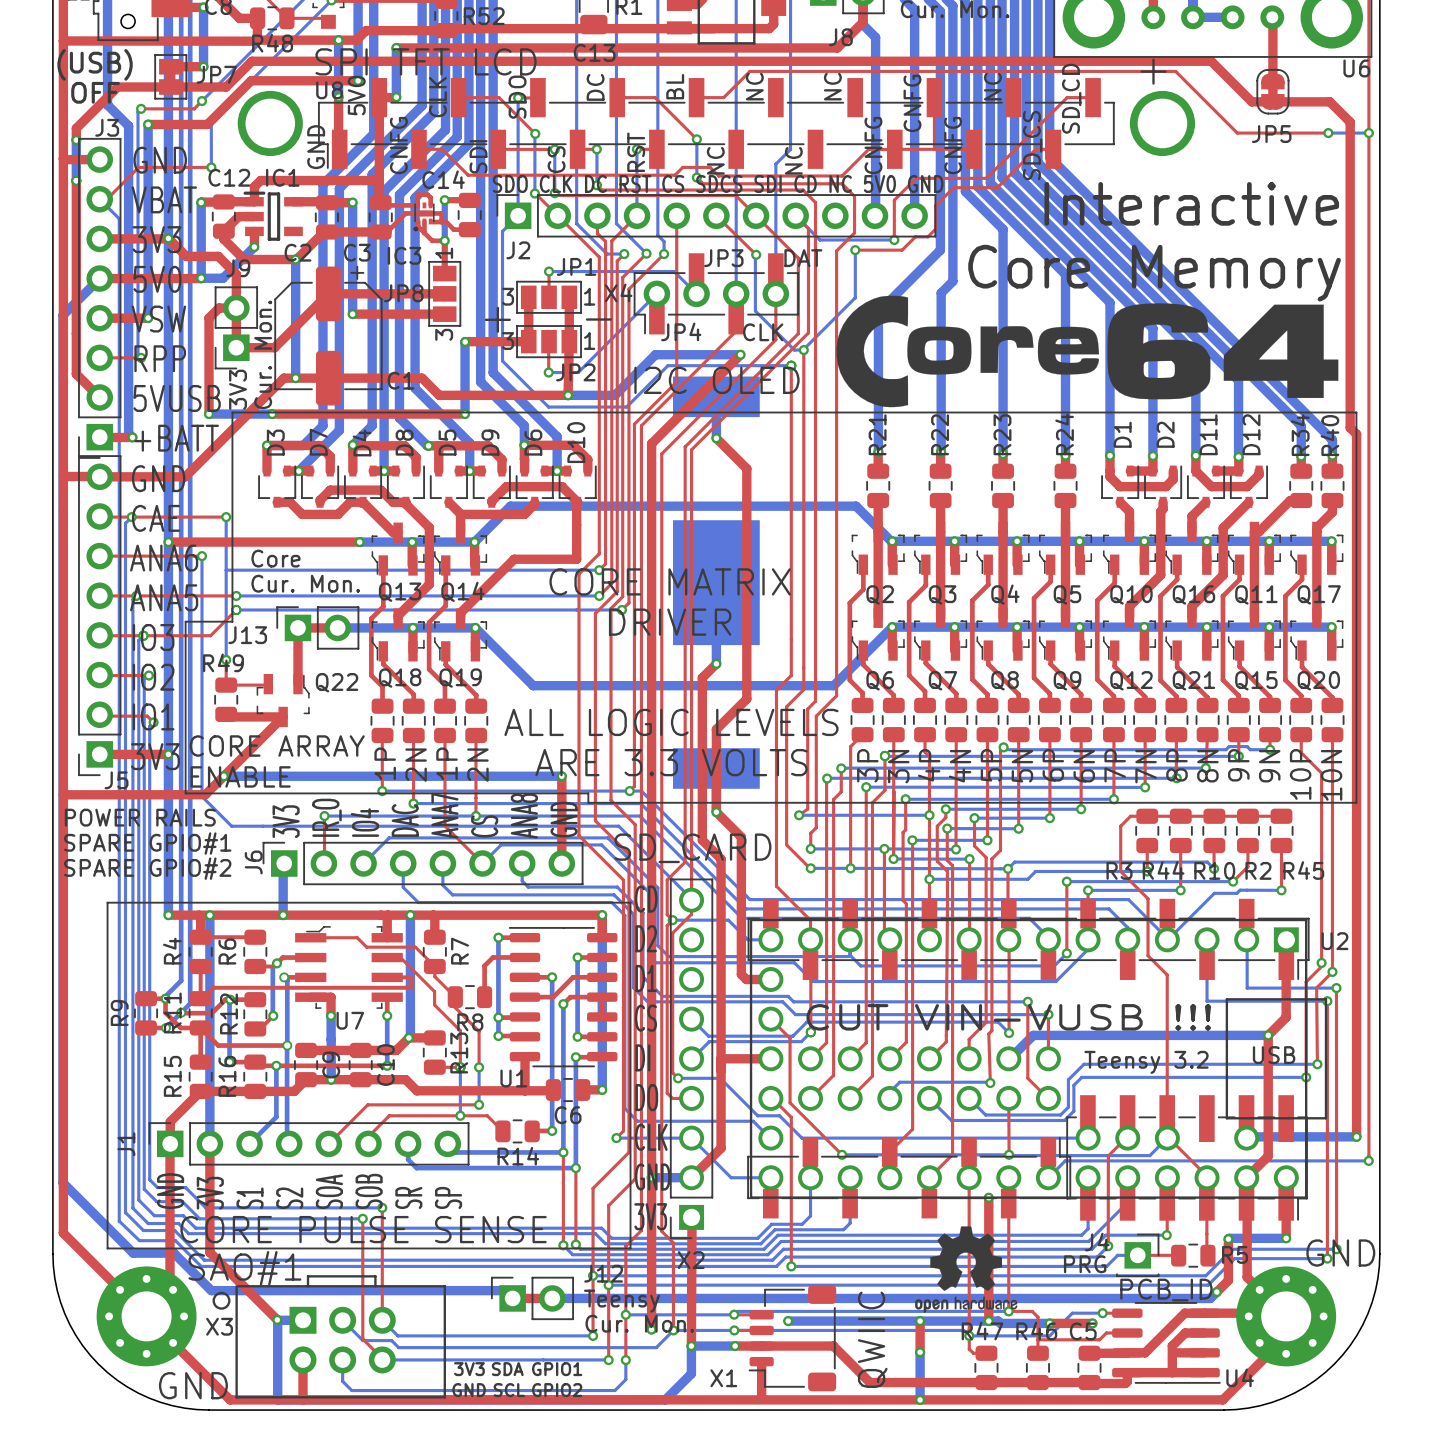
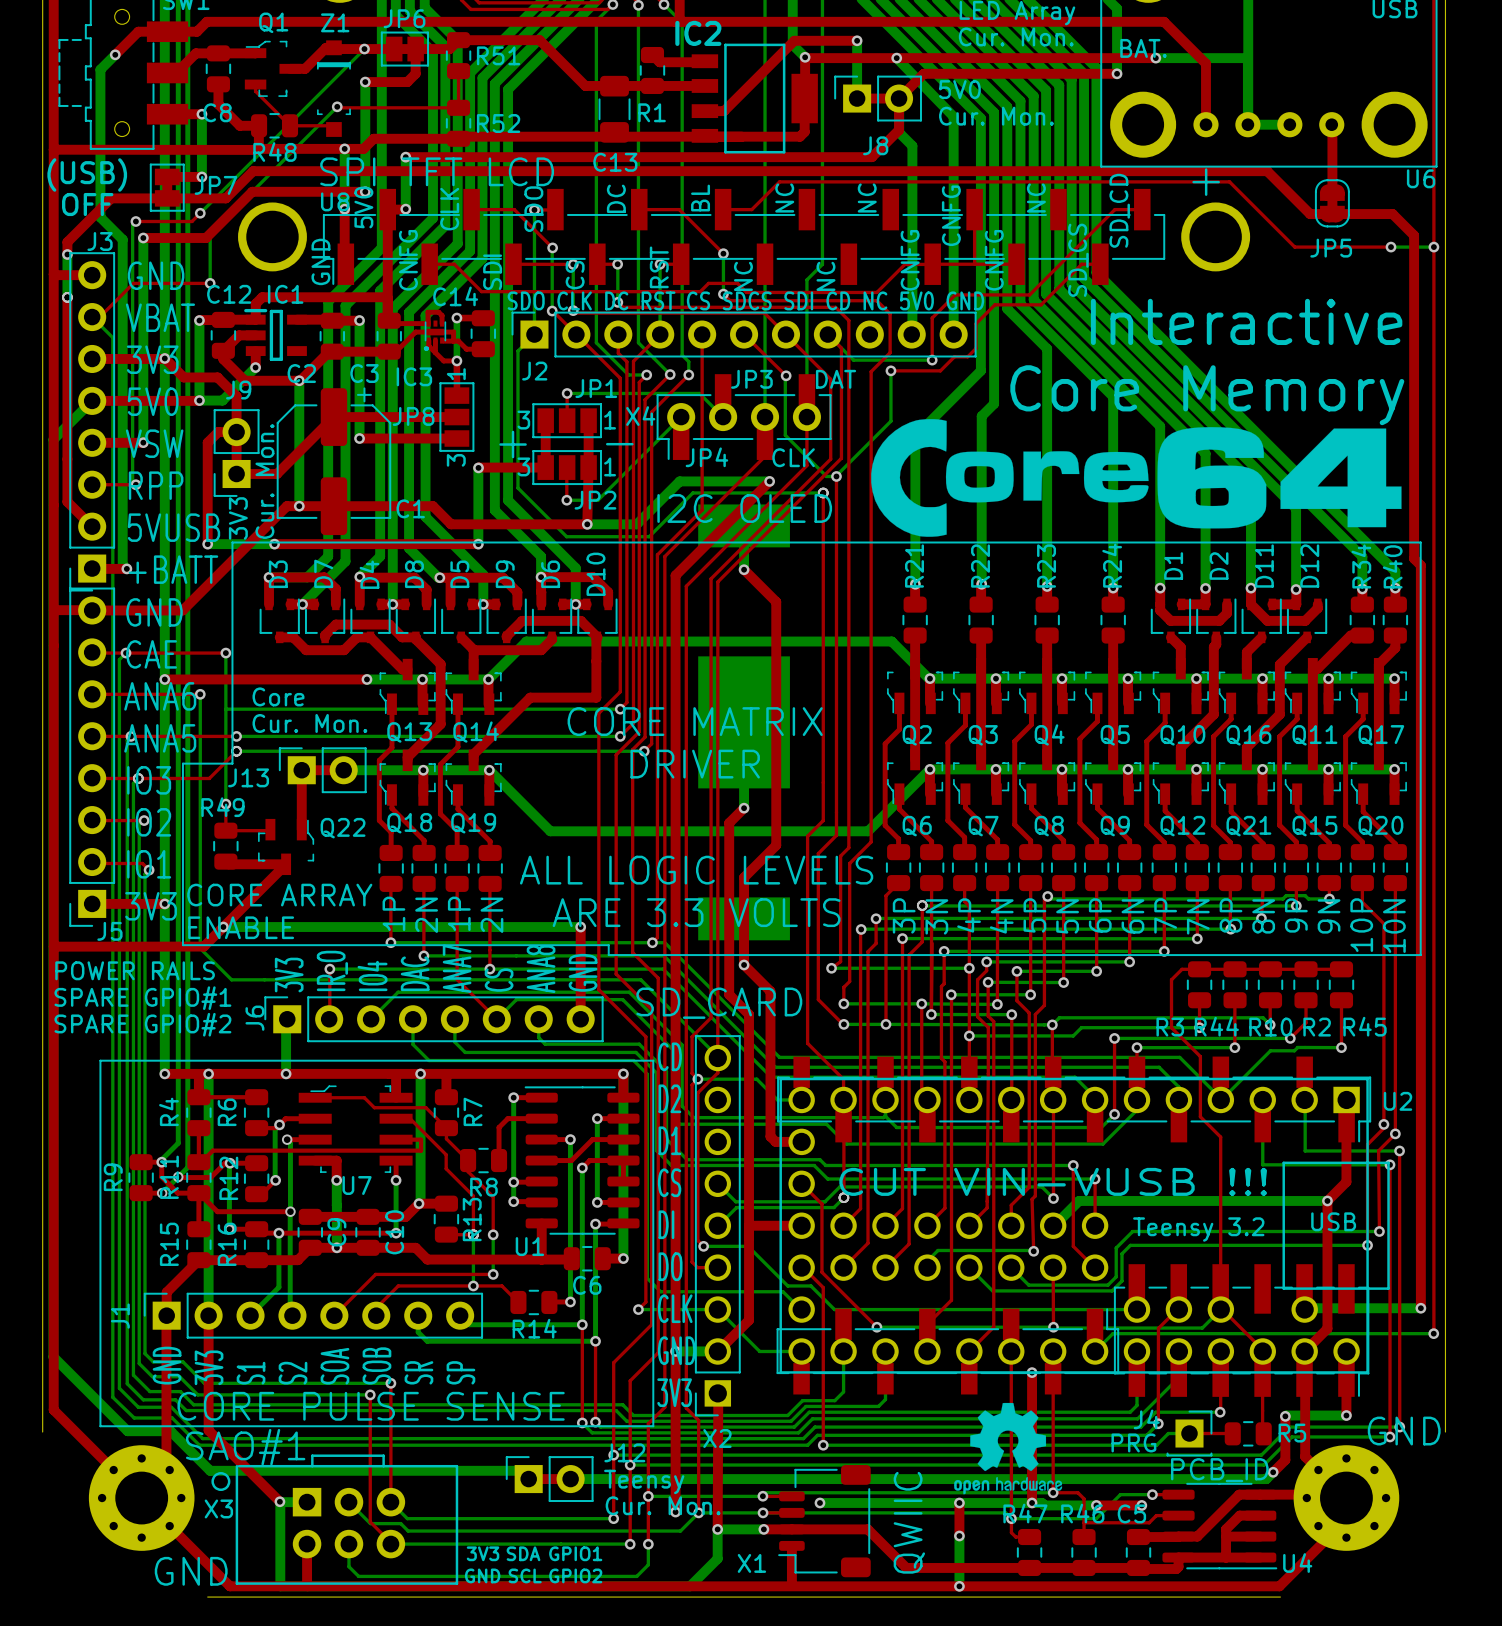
board edge: (52, 1253) (57, 1290) (64, 1313) (75, 1335) (98, 1364) (117, 1380) (149, 1398) (184, 1408) (209, 1410) -> none
board edge: (1379, 1253) (1375, 1290) (1367, 1313) (1356, 1335) (1334, 1364) (1315, 1380) (1283, 1398) (1248, 1408) (1223, 1410) -> none

